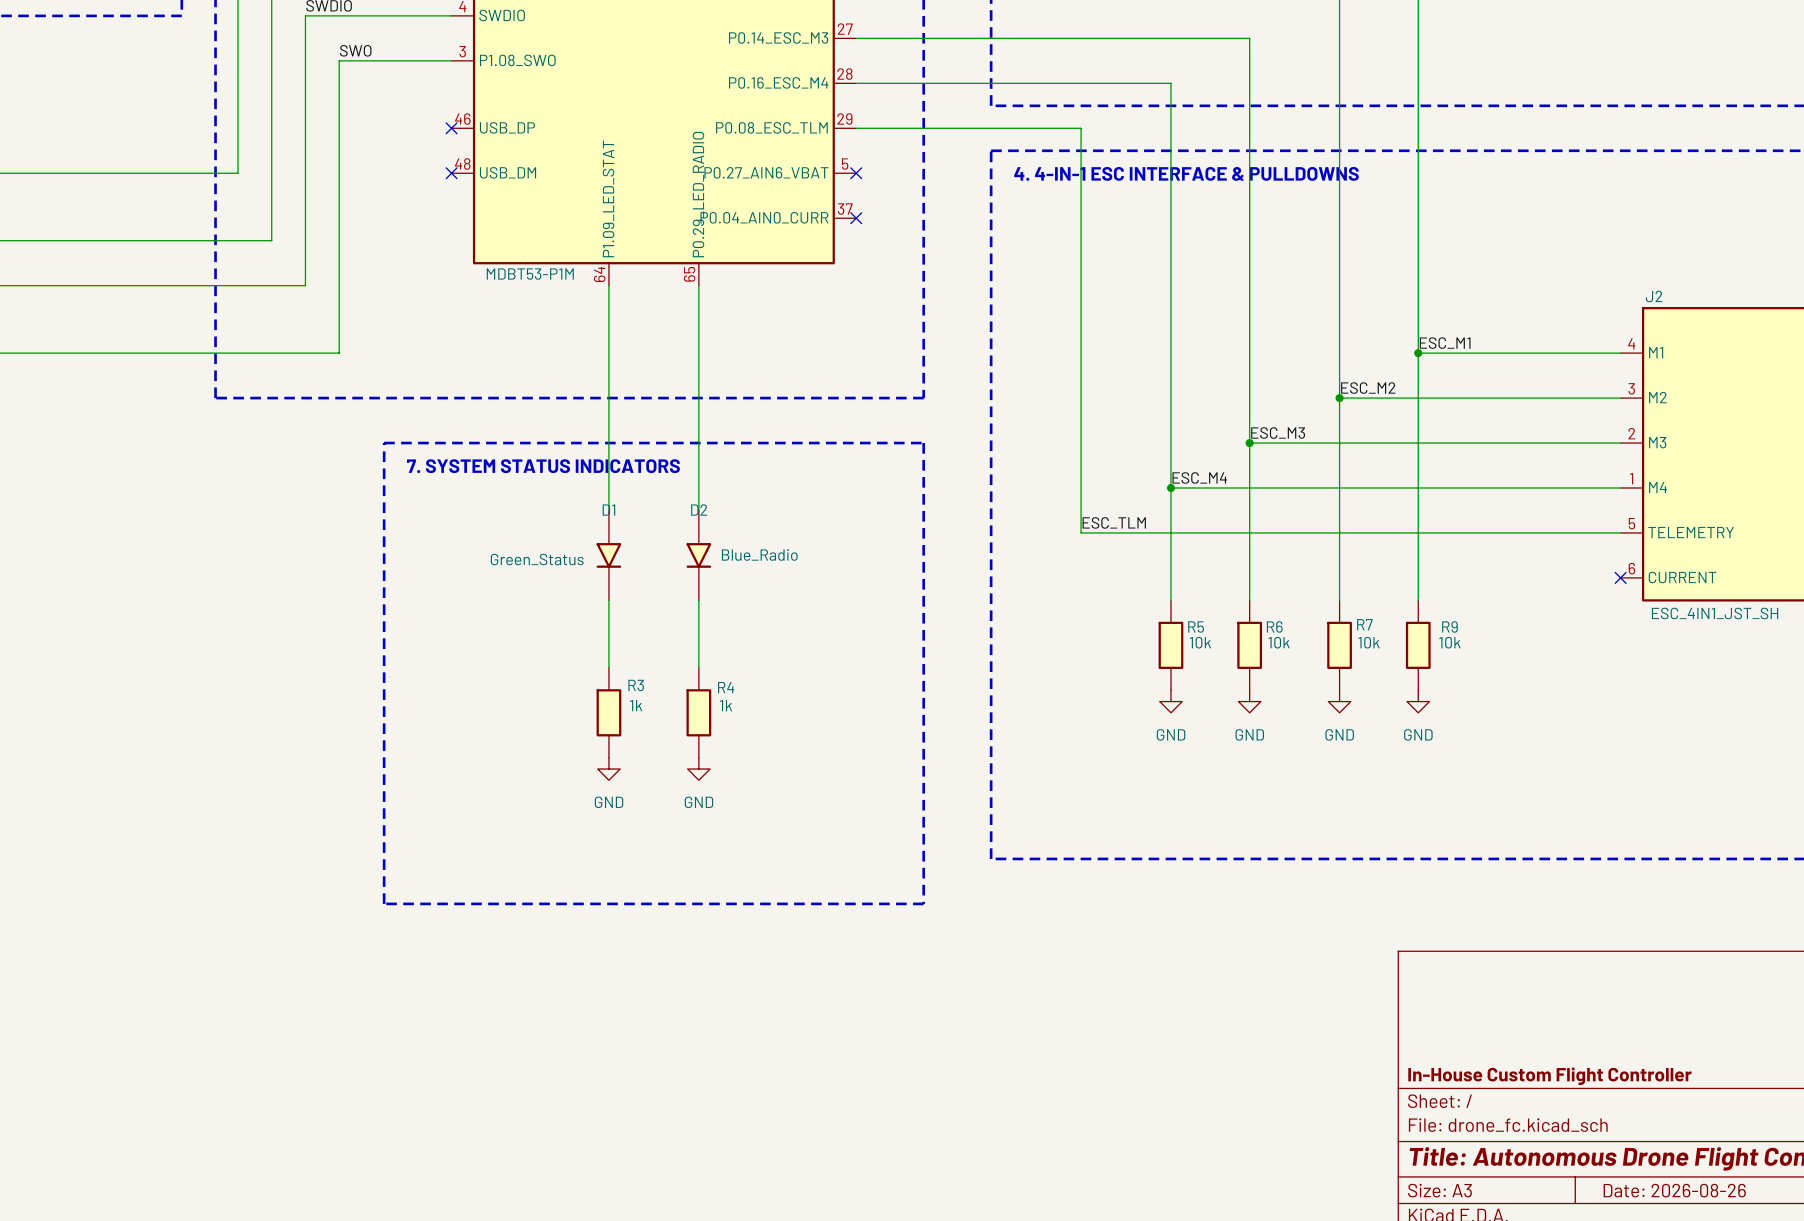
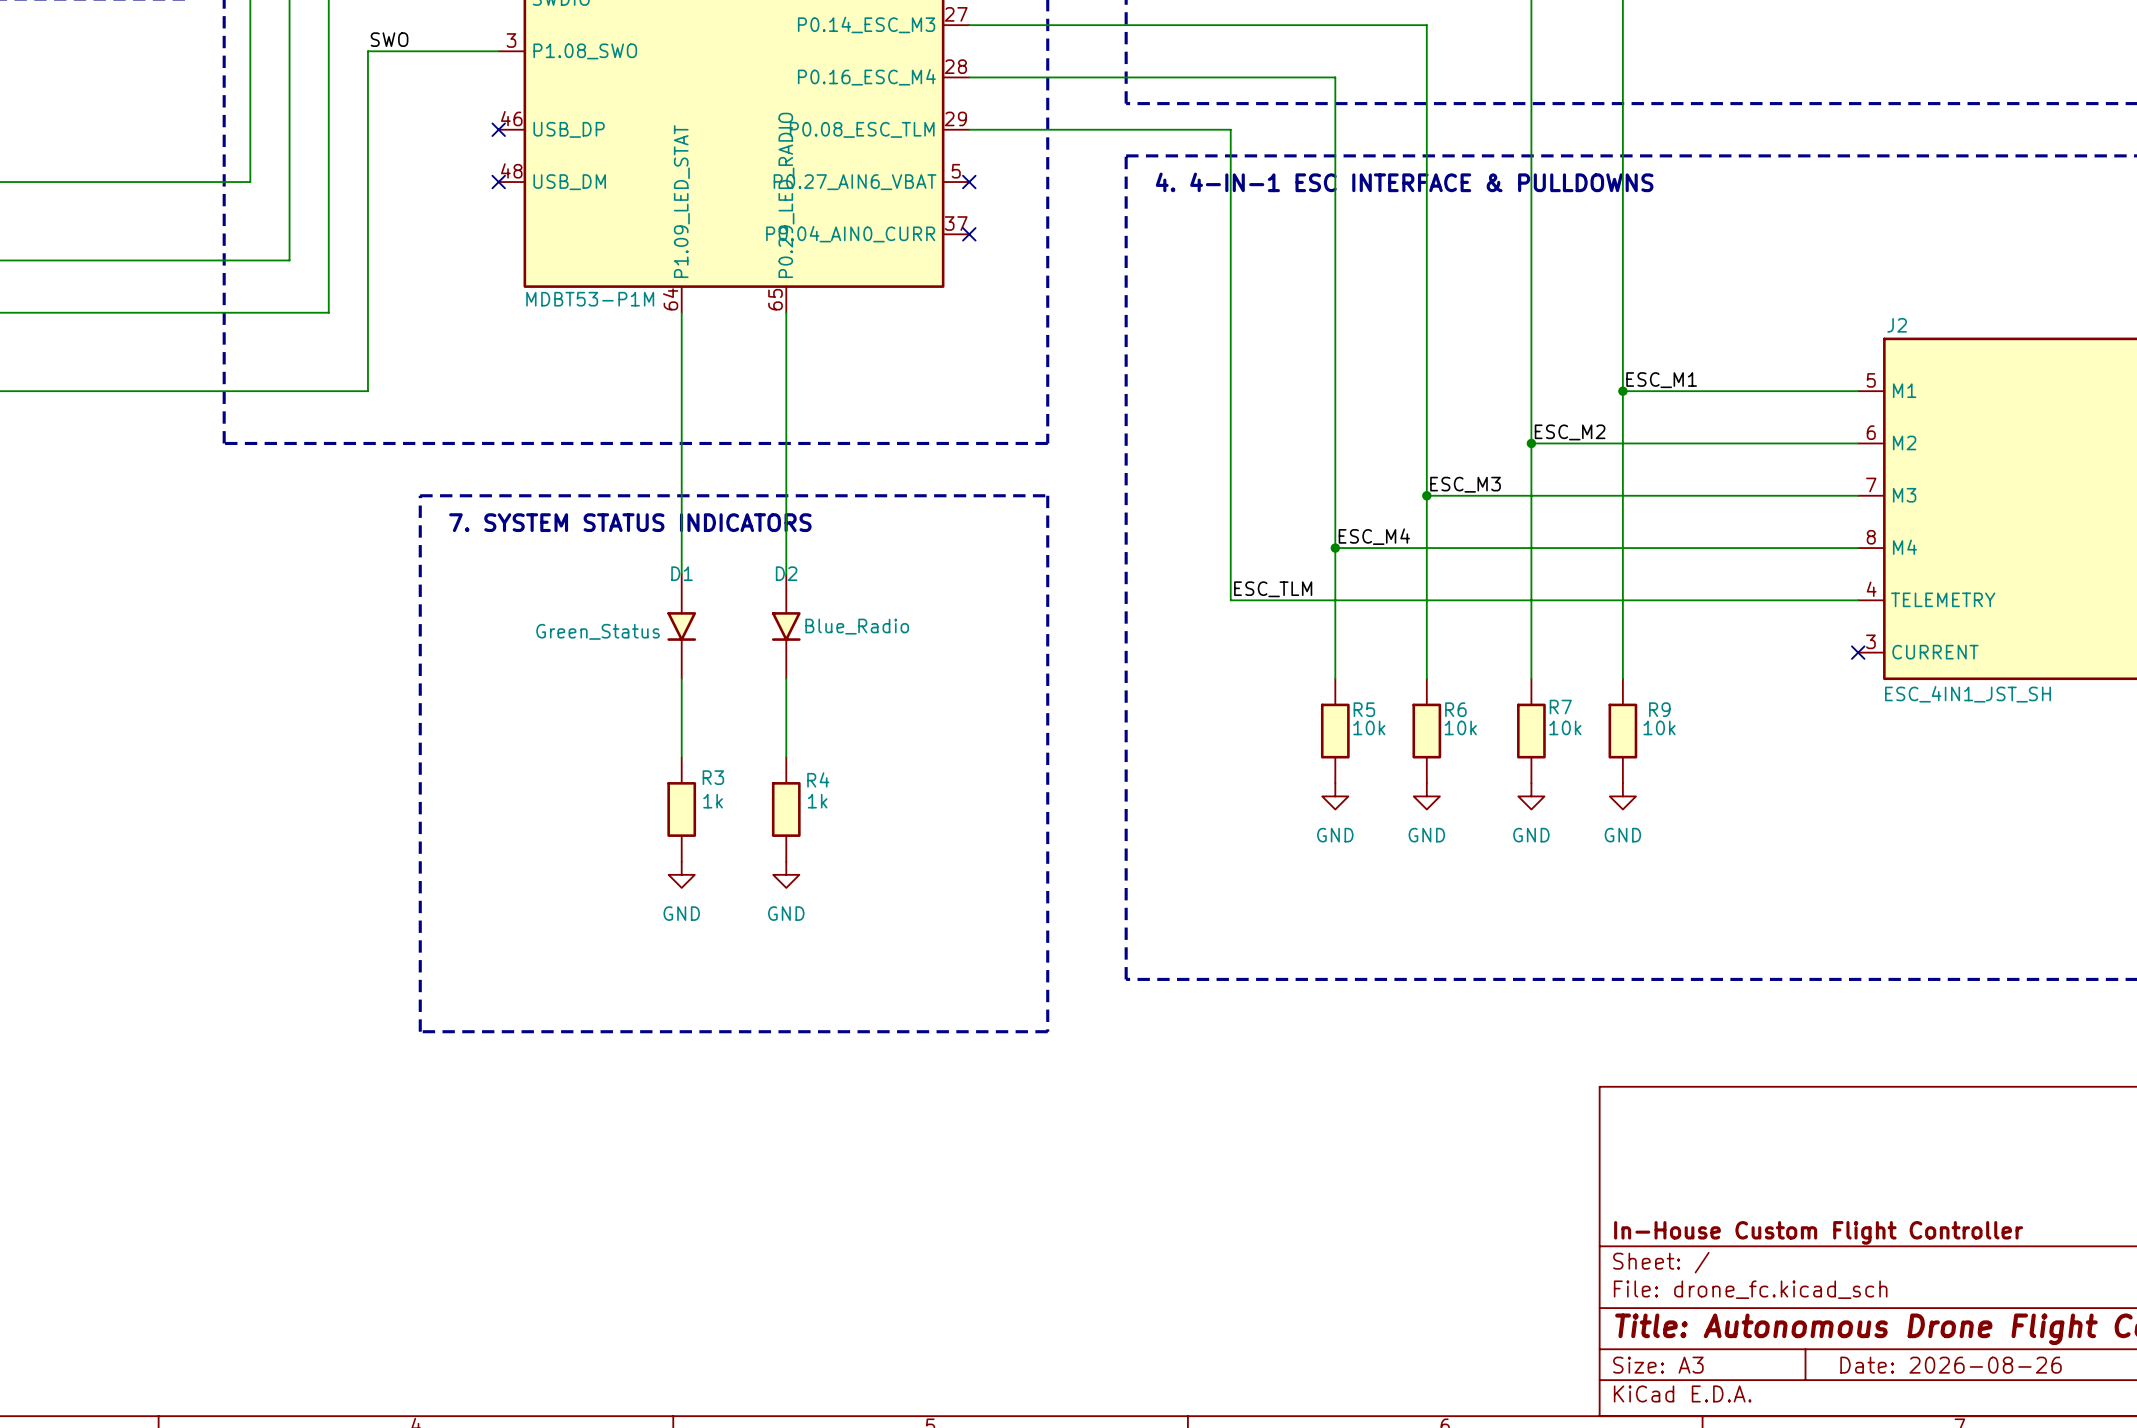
J2 pin number: 4 (1631, 343) -> 5 (1871, 380)
J2 pin number: 3 (1631, 388) -> 6 (1871, 432)
J2 pin number: 2 (1631, 433) -> 7 (1871, 484)
J2 pin number: 1 (1631, 478) -> 8 (1871, 537)
J2 pin number: 5 (1631, 523) -> 4 (1871, 589)
J2 pin number: 6 (1631, 568) -> 3 (1870, 641)

